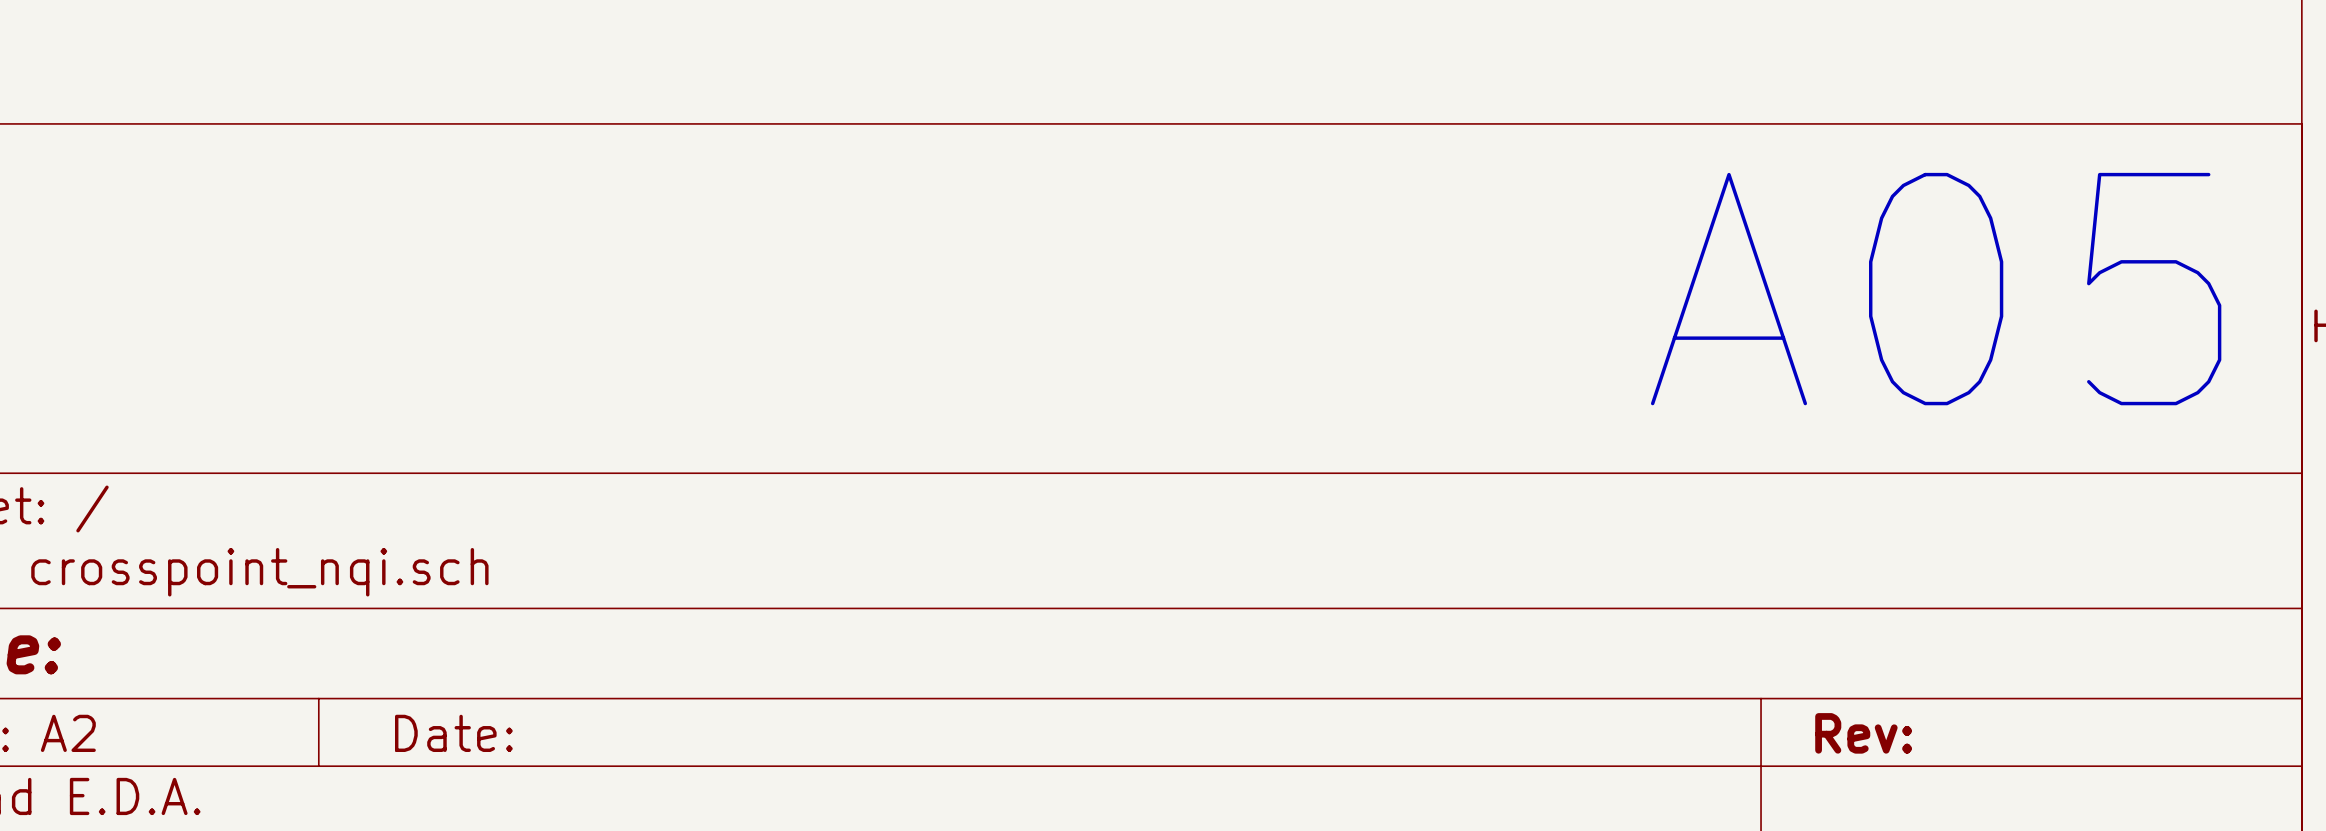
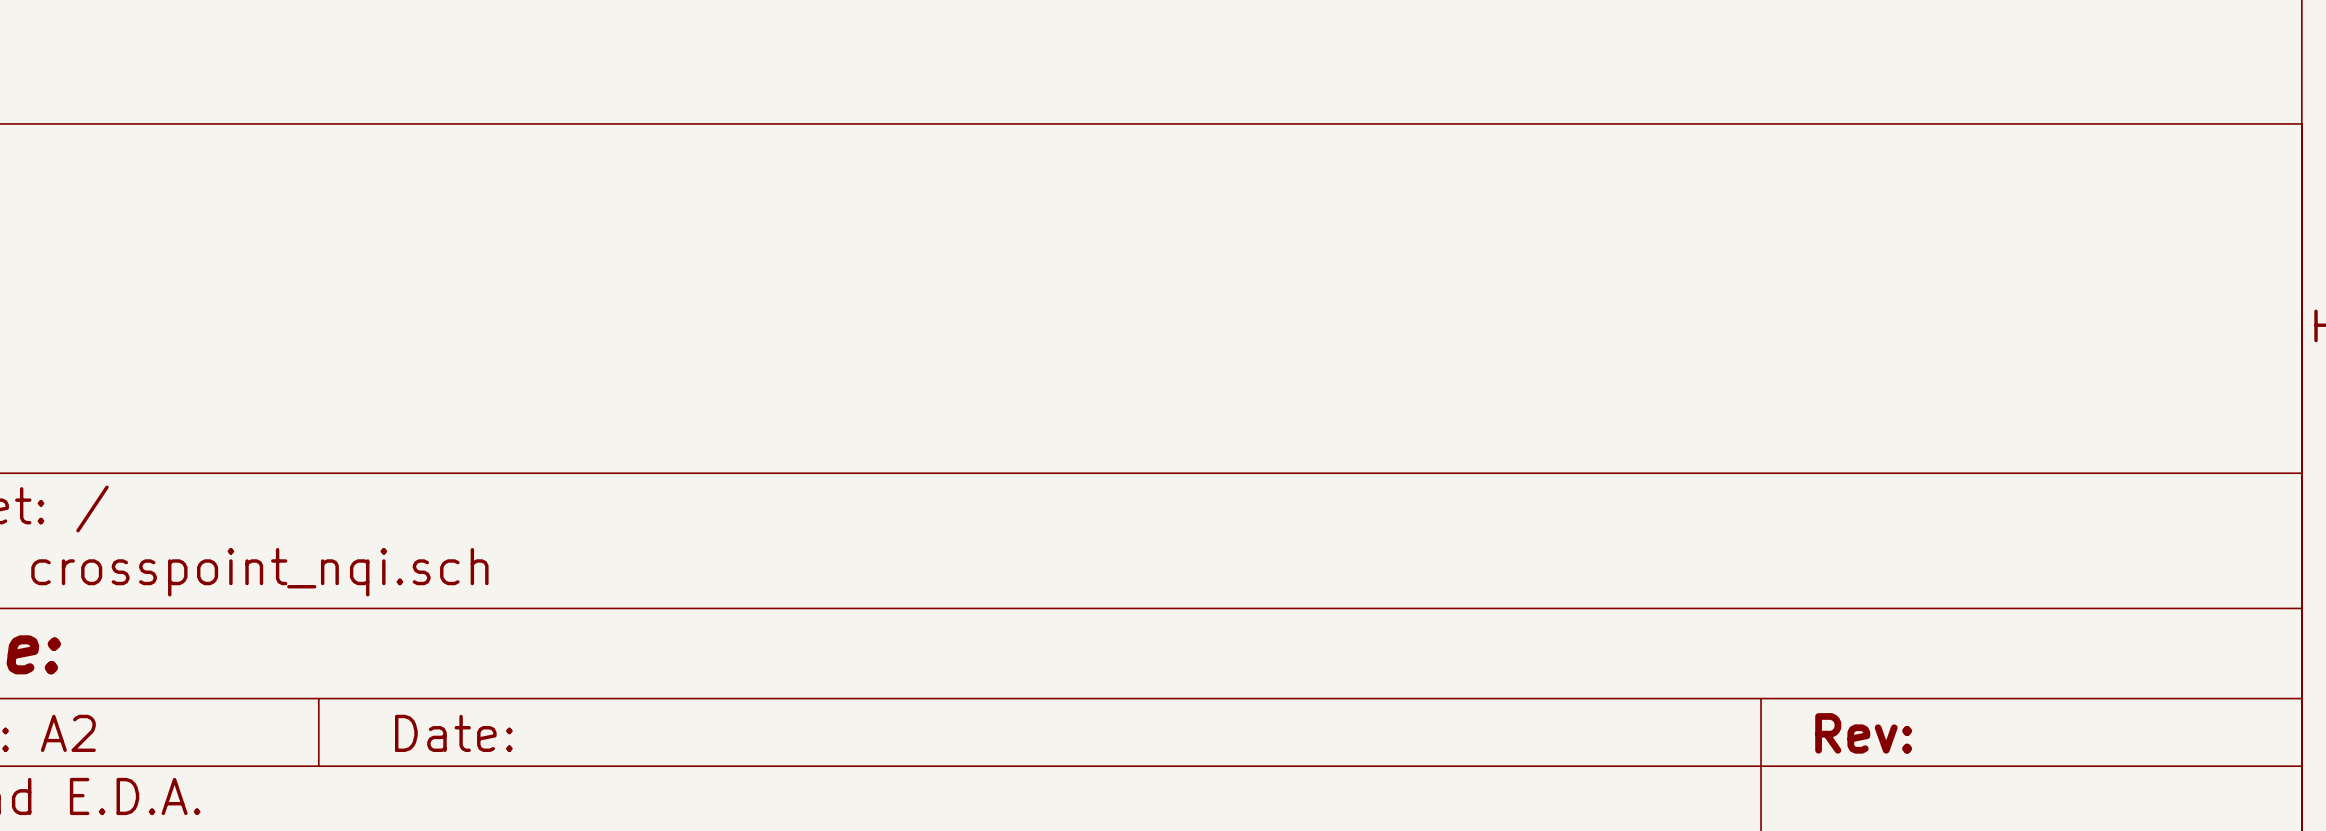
text: A05 (1936, 289) -> none

